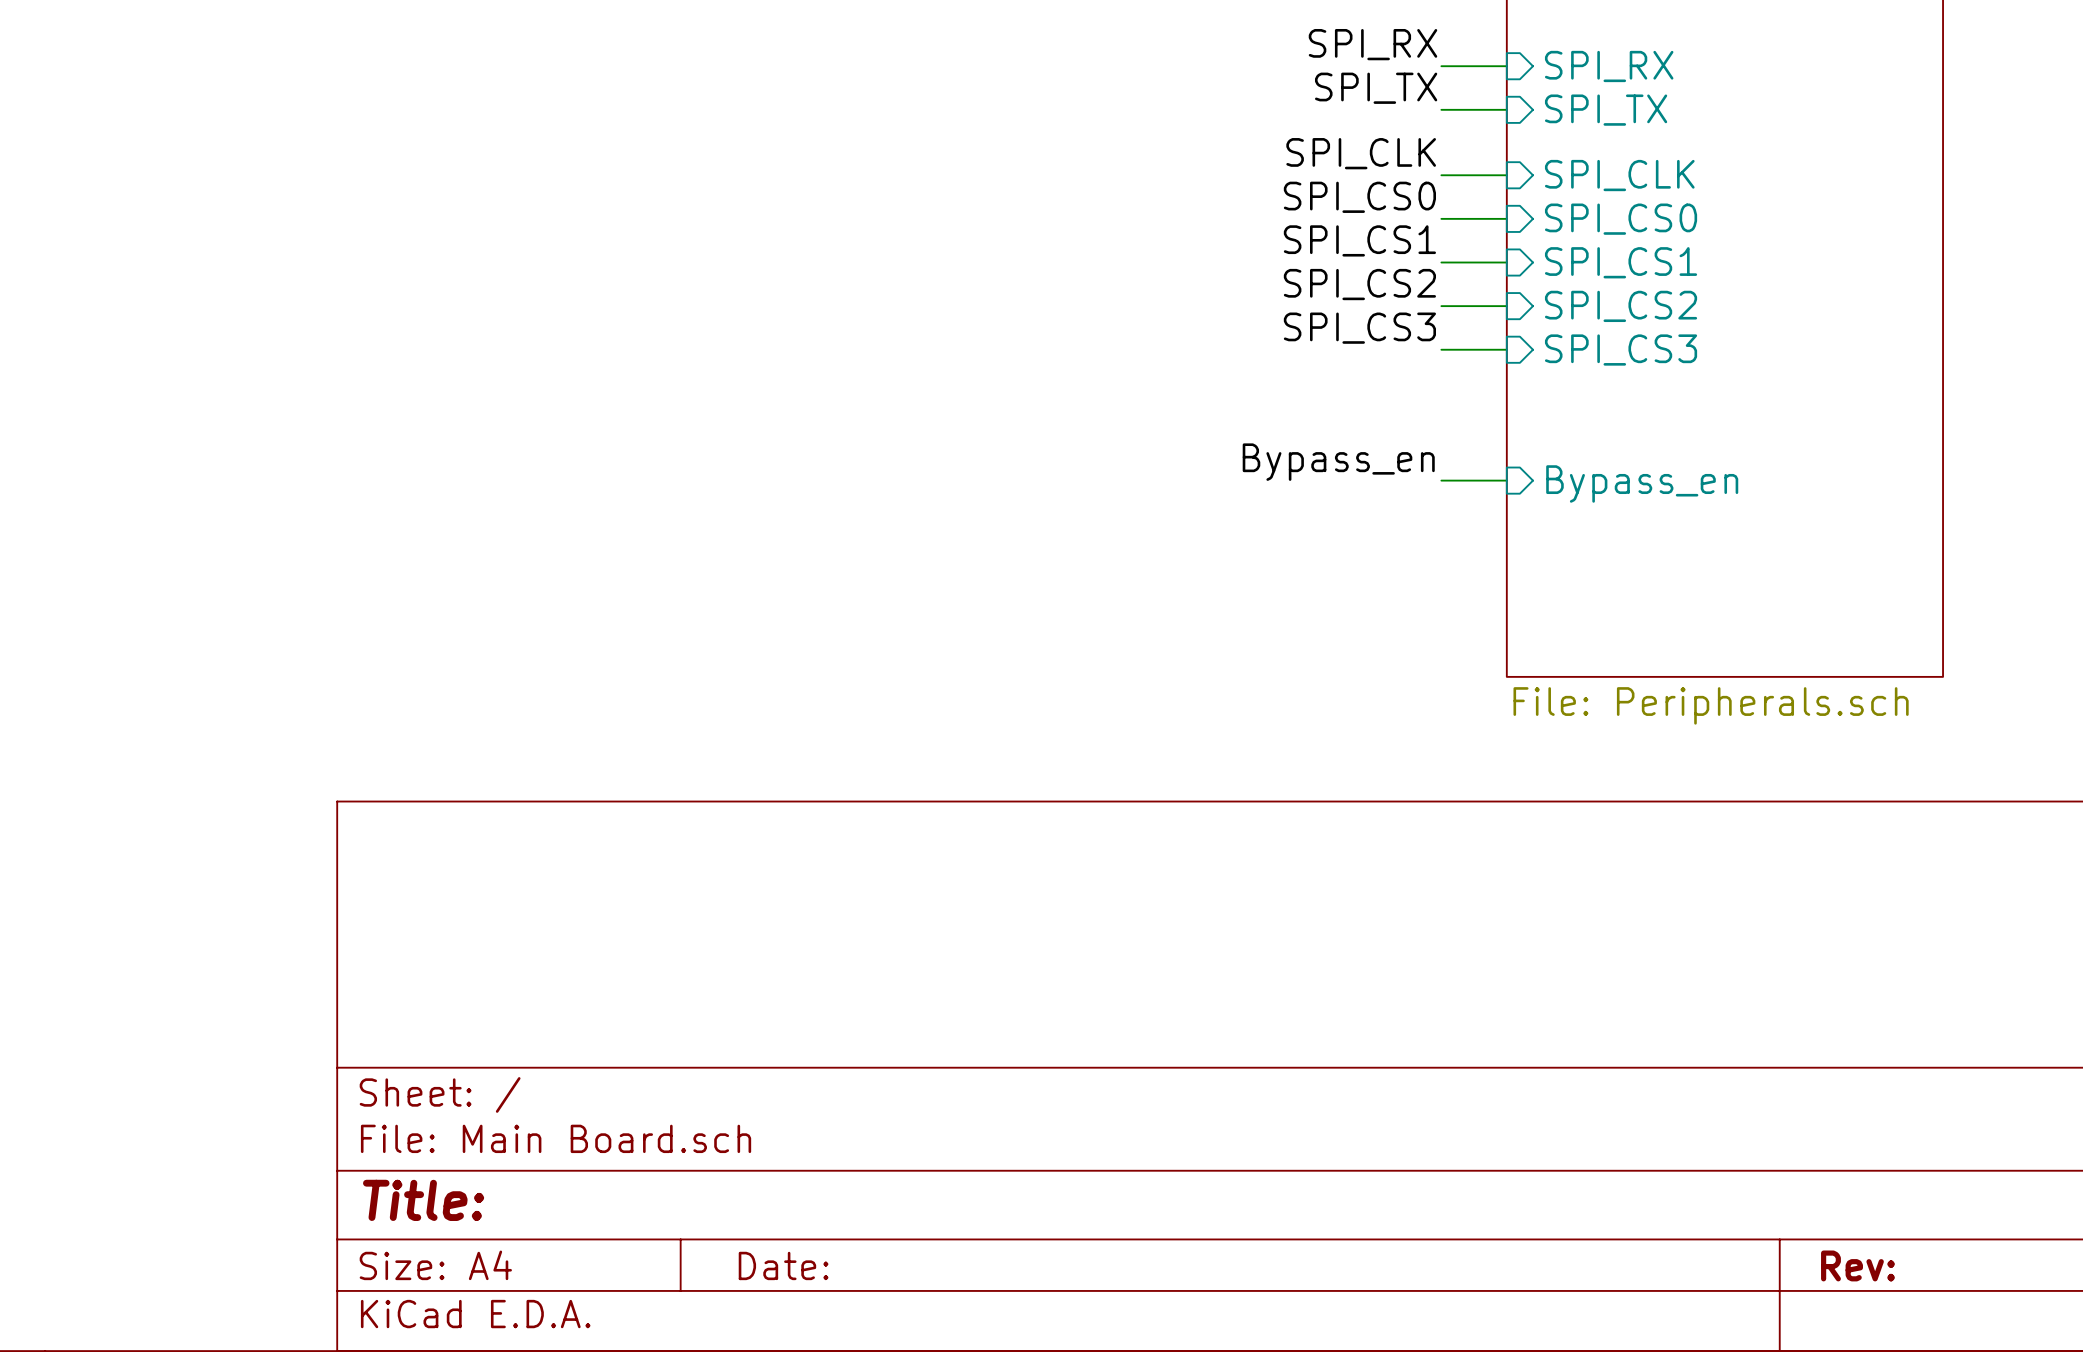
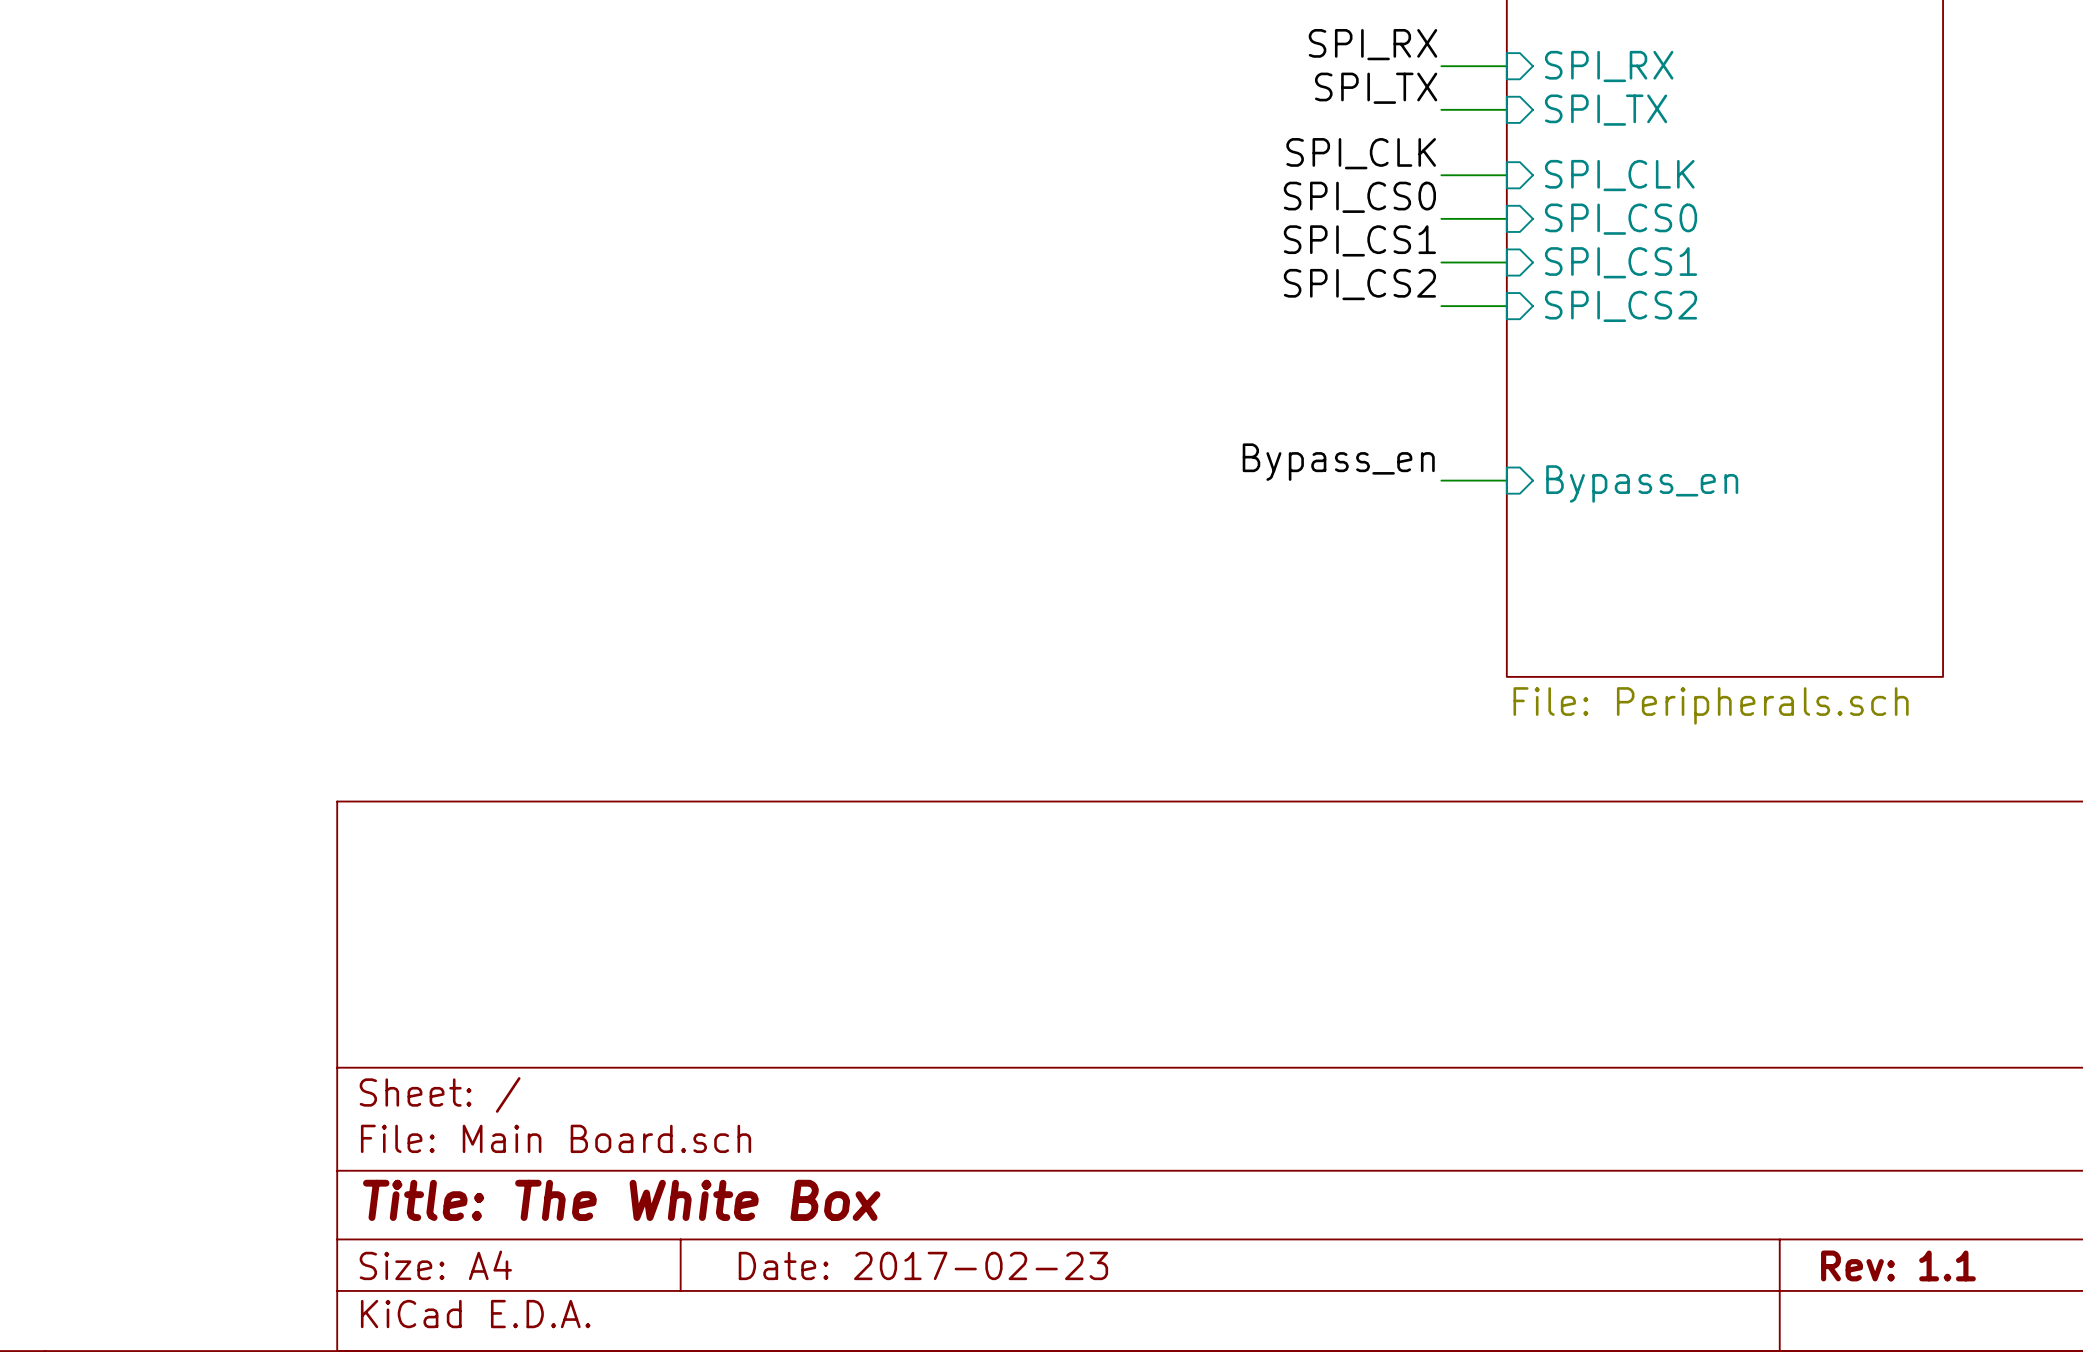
label: SPI_CS3 (1359, 328) -> none
wire: (1441, 349) (1506, 349) -> none
sheet pin: SPI_CS3 (1621, 350) -> none
title block: Title: (423, 1200) -> Title: The White Box (621, 1200)
title block: Date: (783, 1265) -> Date: 2017-02-23 (923, 1265)
title block: Rev: (1857, 1265) -> Rev: 1.1 (1898, 1265)

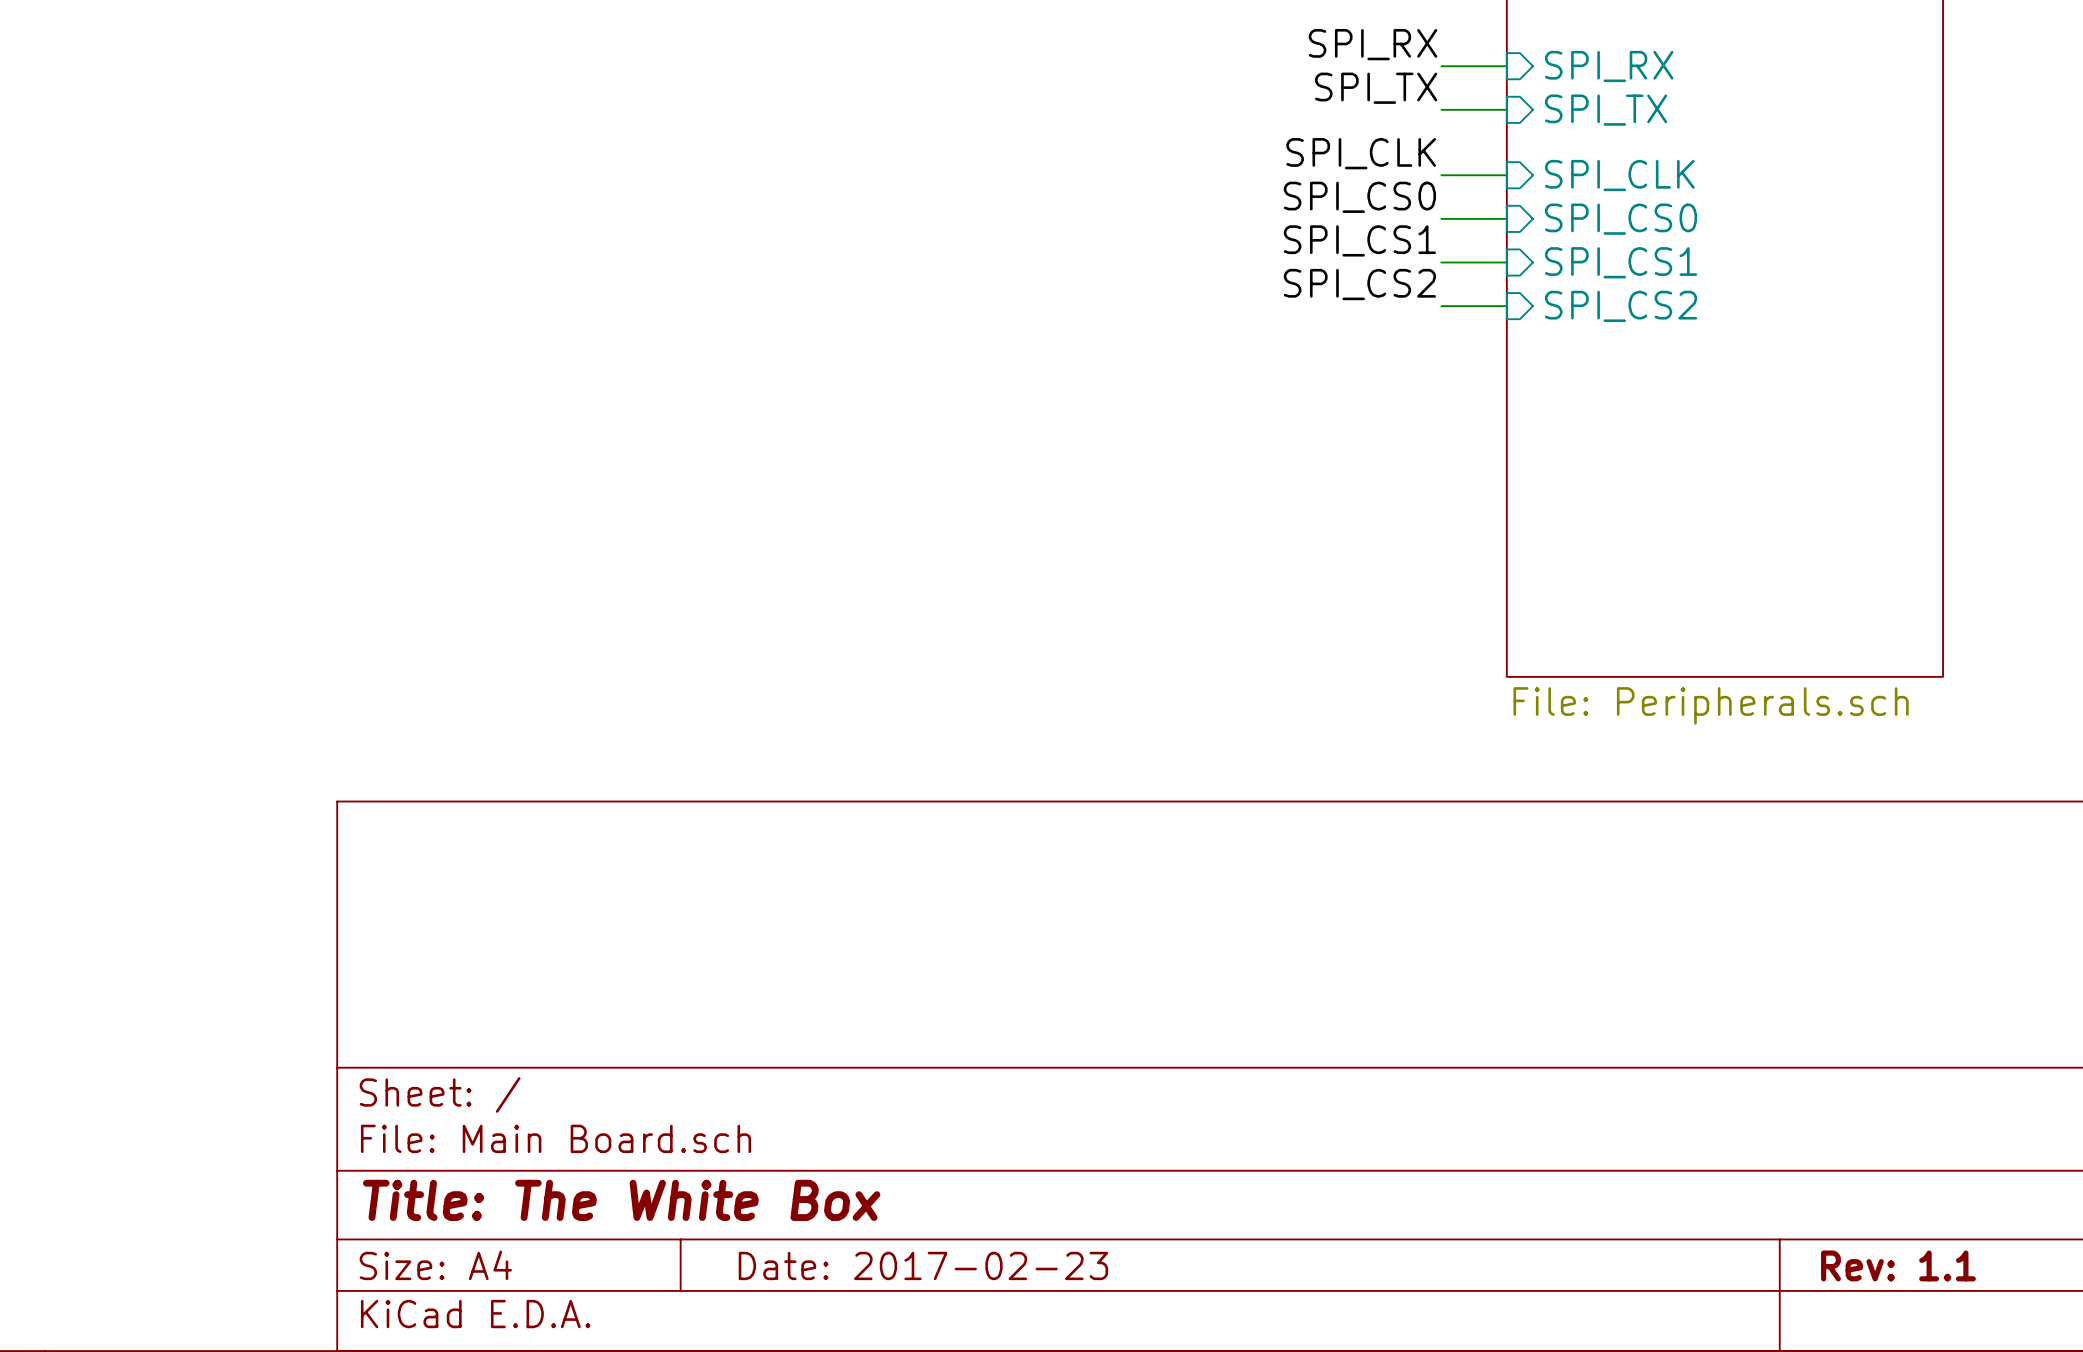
label: Bypass_en (1338, 462) -> none
wire: (1441, 480) (1506, 480) -> none
sheet pin: Bypass_en (1642, 483) -> none

